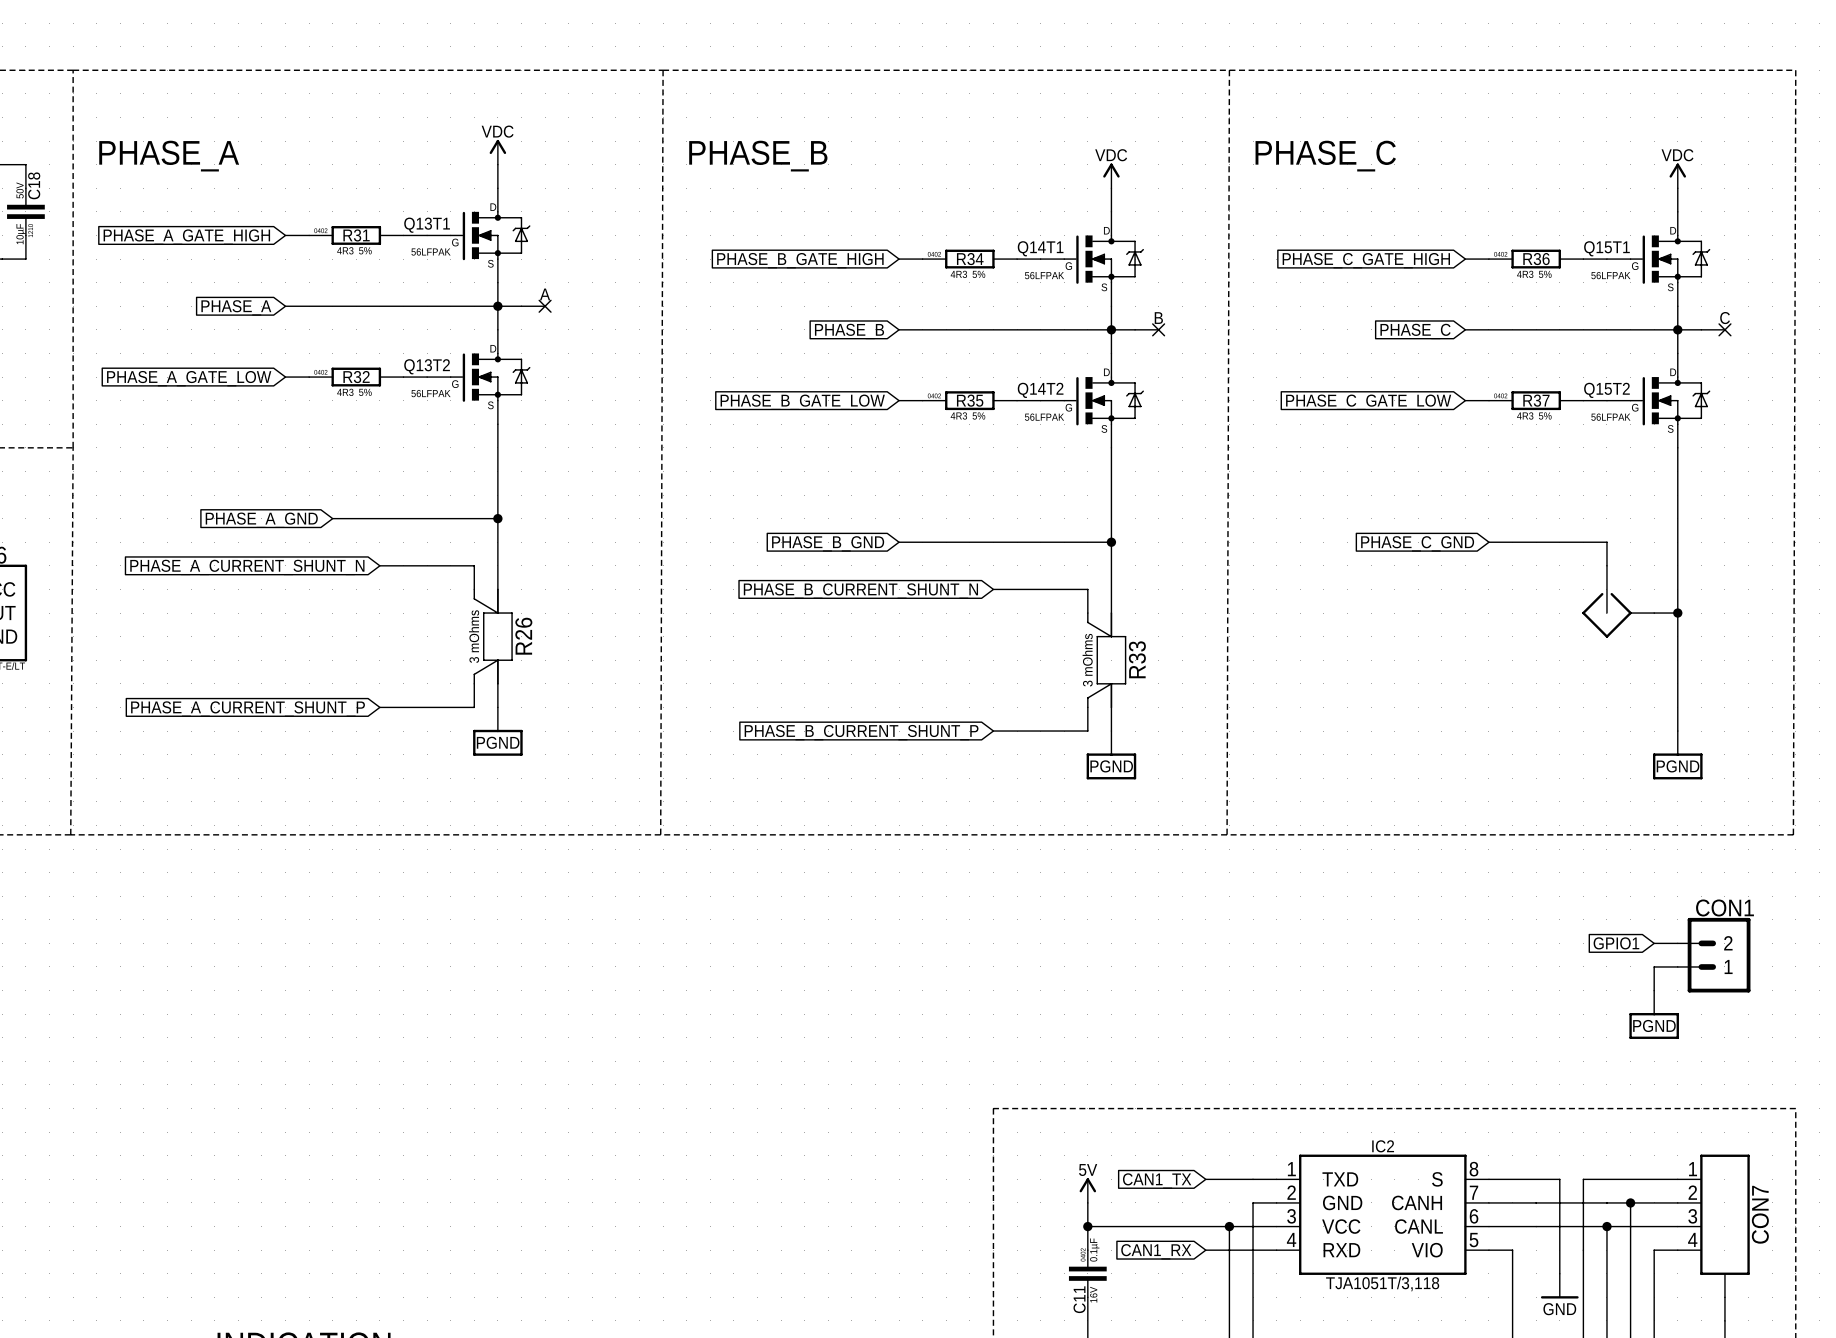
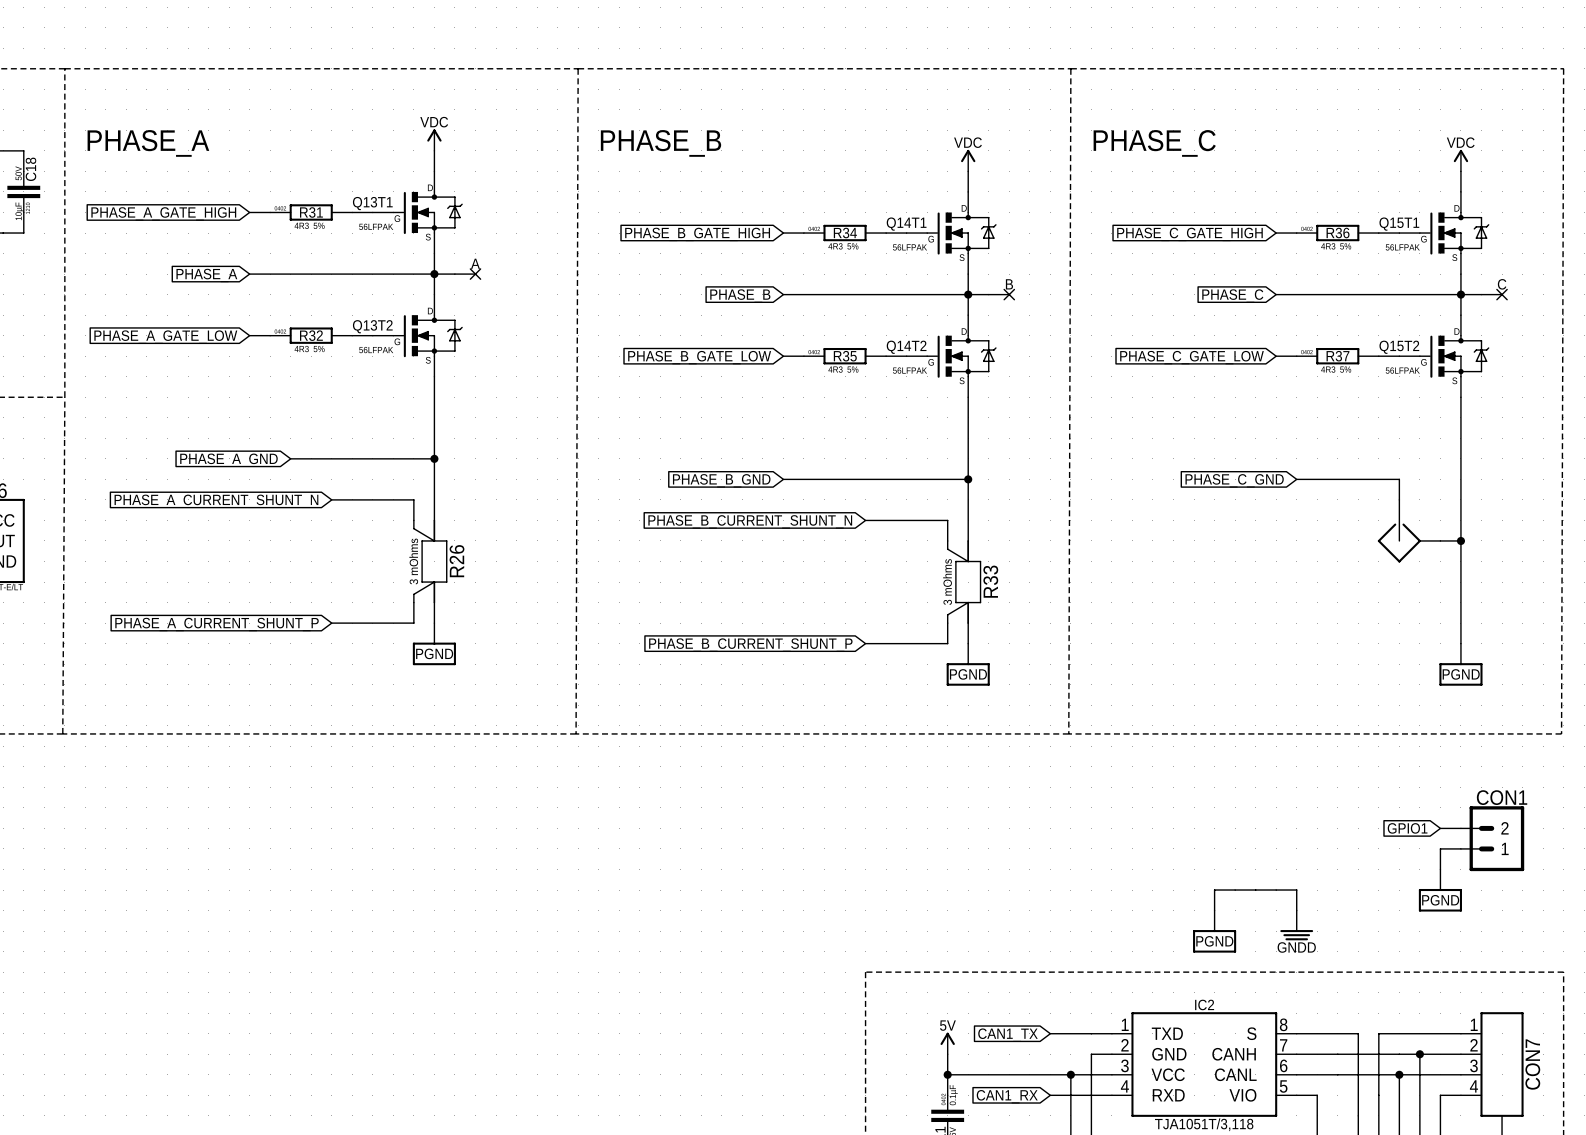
wire: none -> (1235, 890) (1214, 890) (1214, 910)
part: none -> (1255, 890)
wire: none -> (1276, 890) (1296, 890) (1296, 910)
power symbol: none -> GNDD (1296, 925)
power symbol: none -> PGND (1214, 931)

